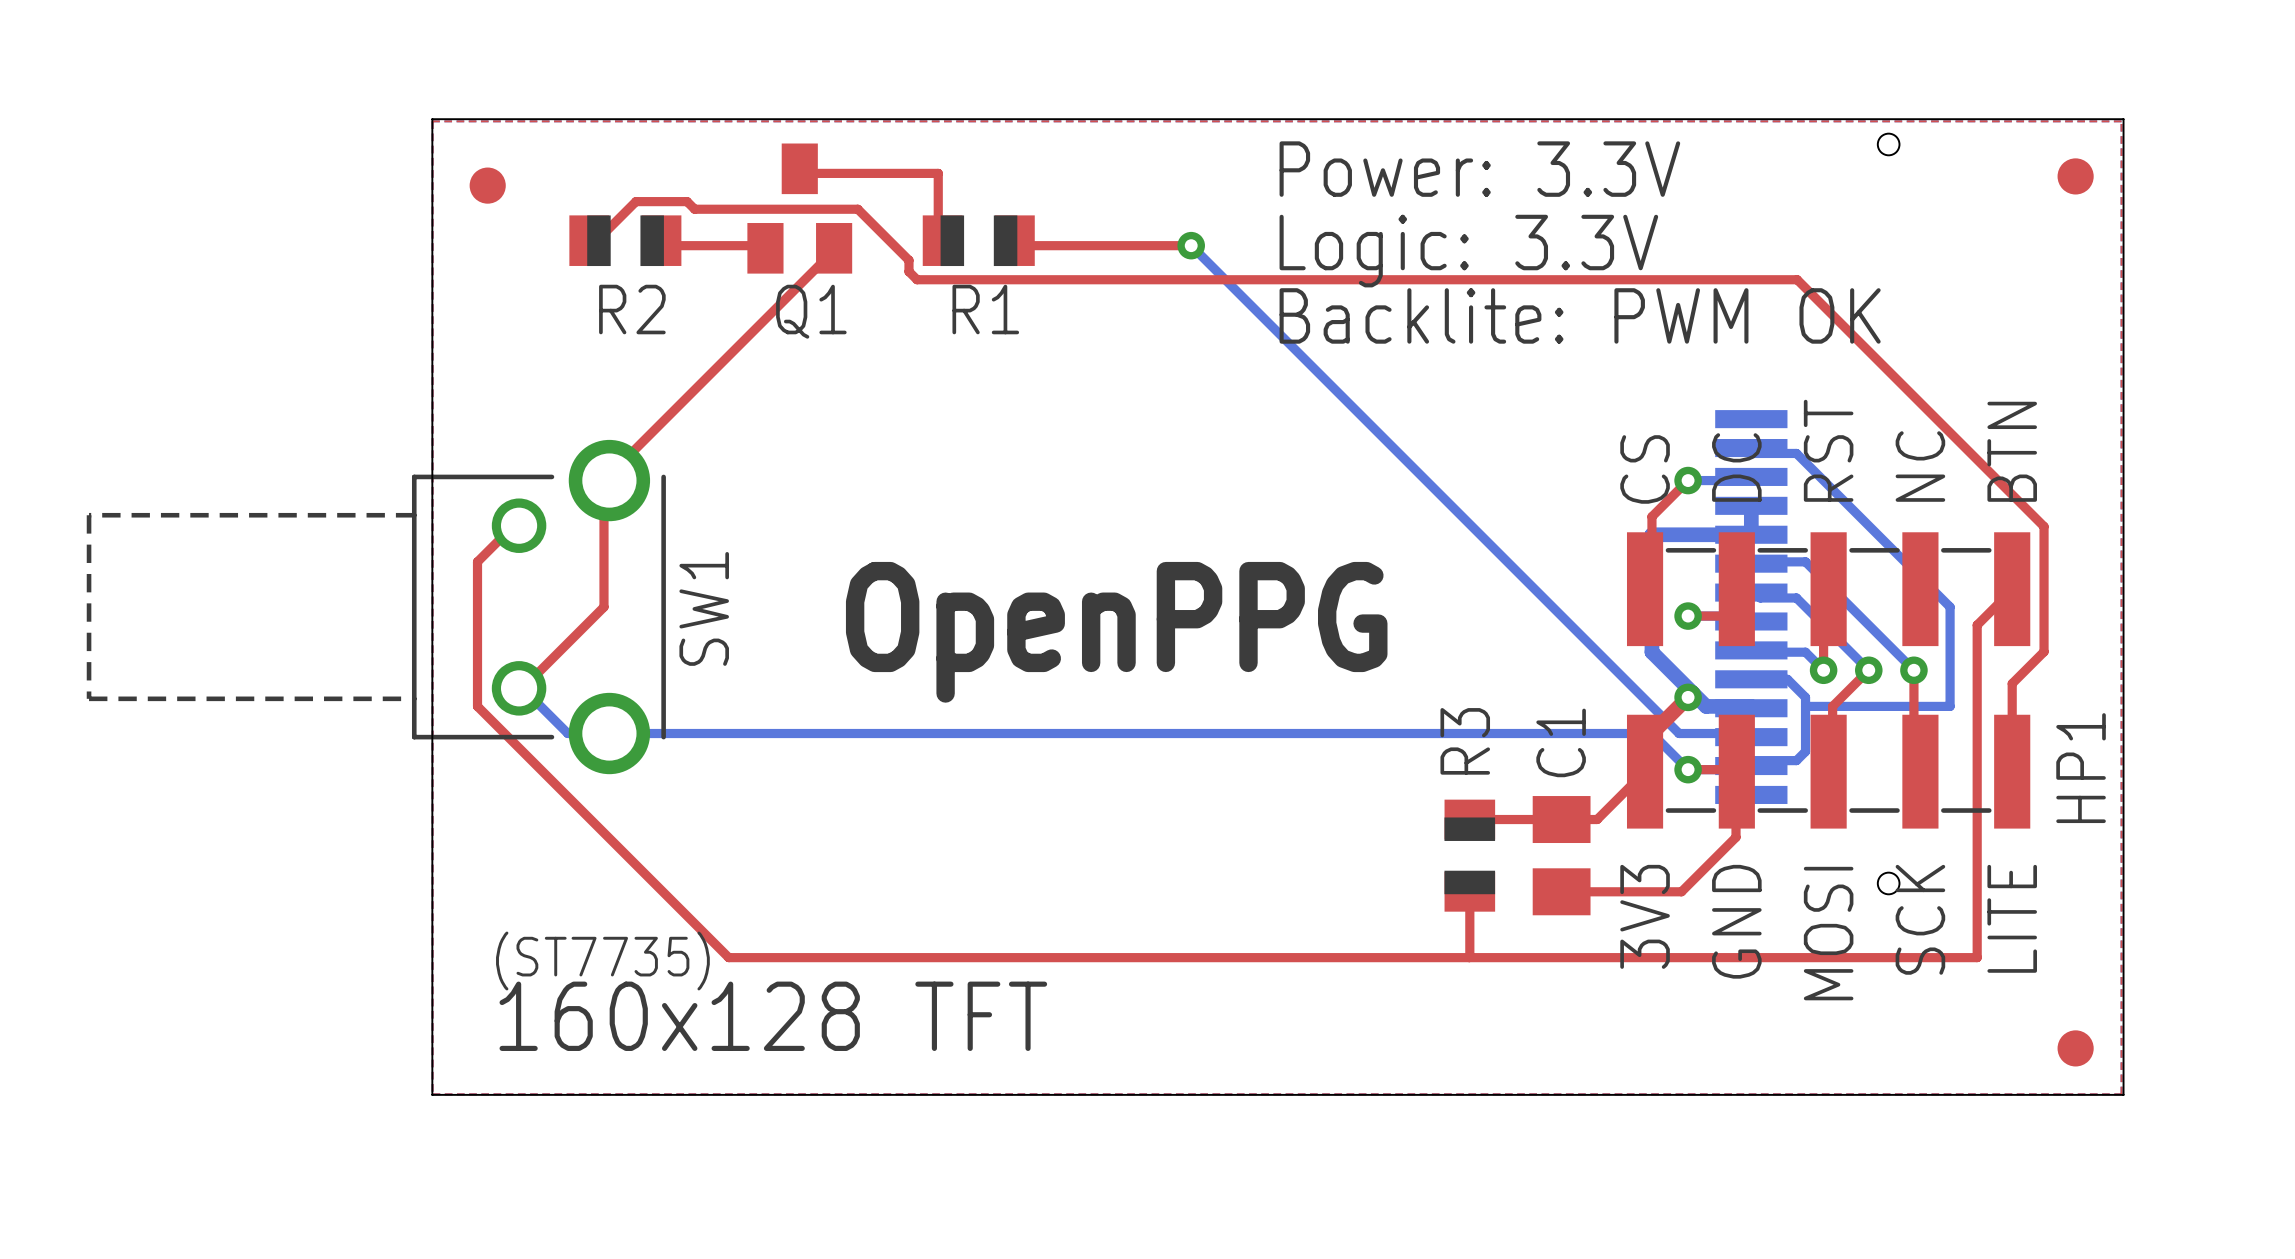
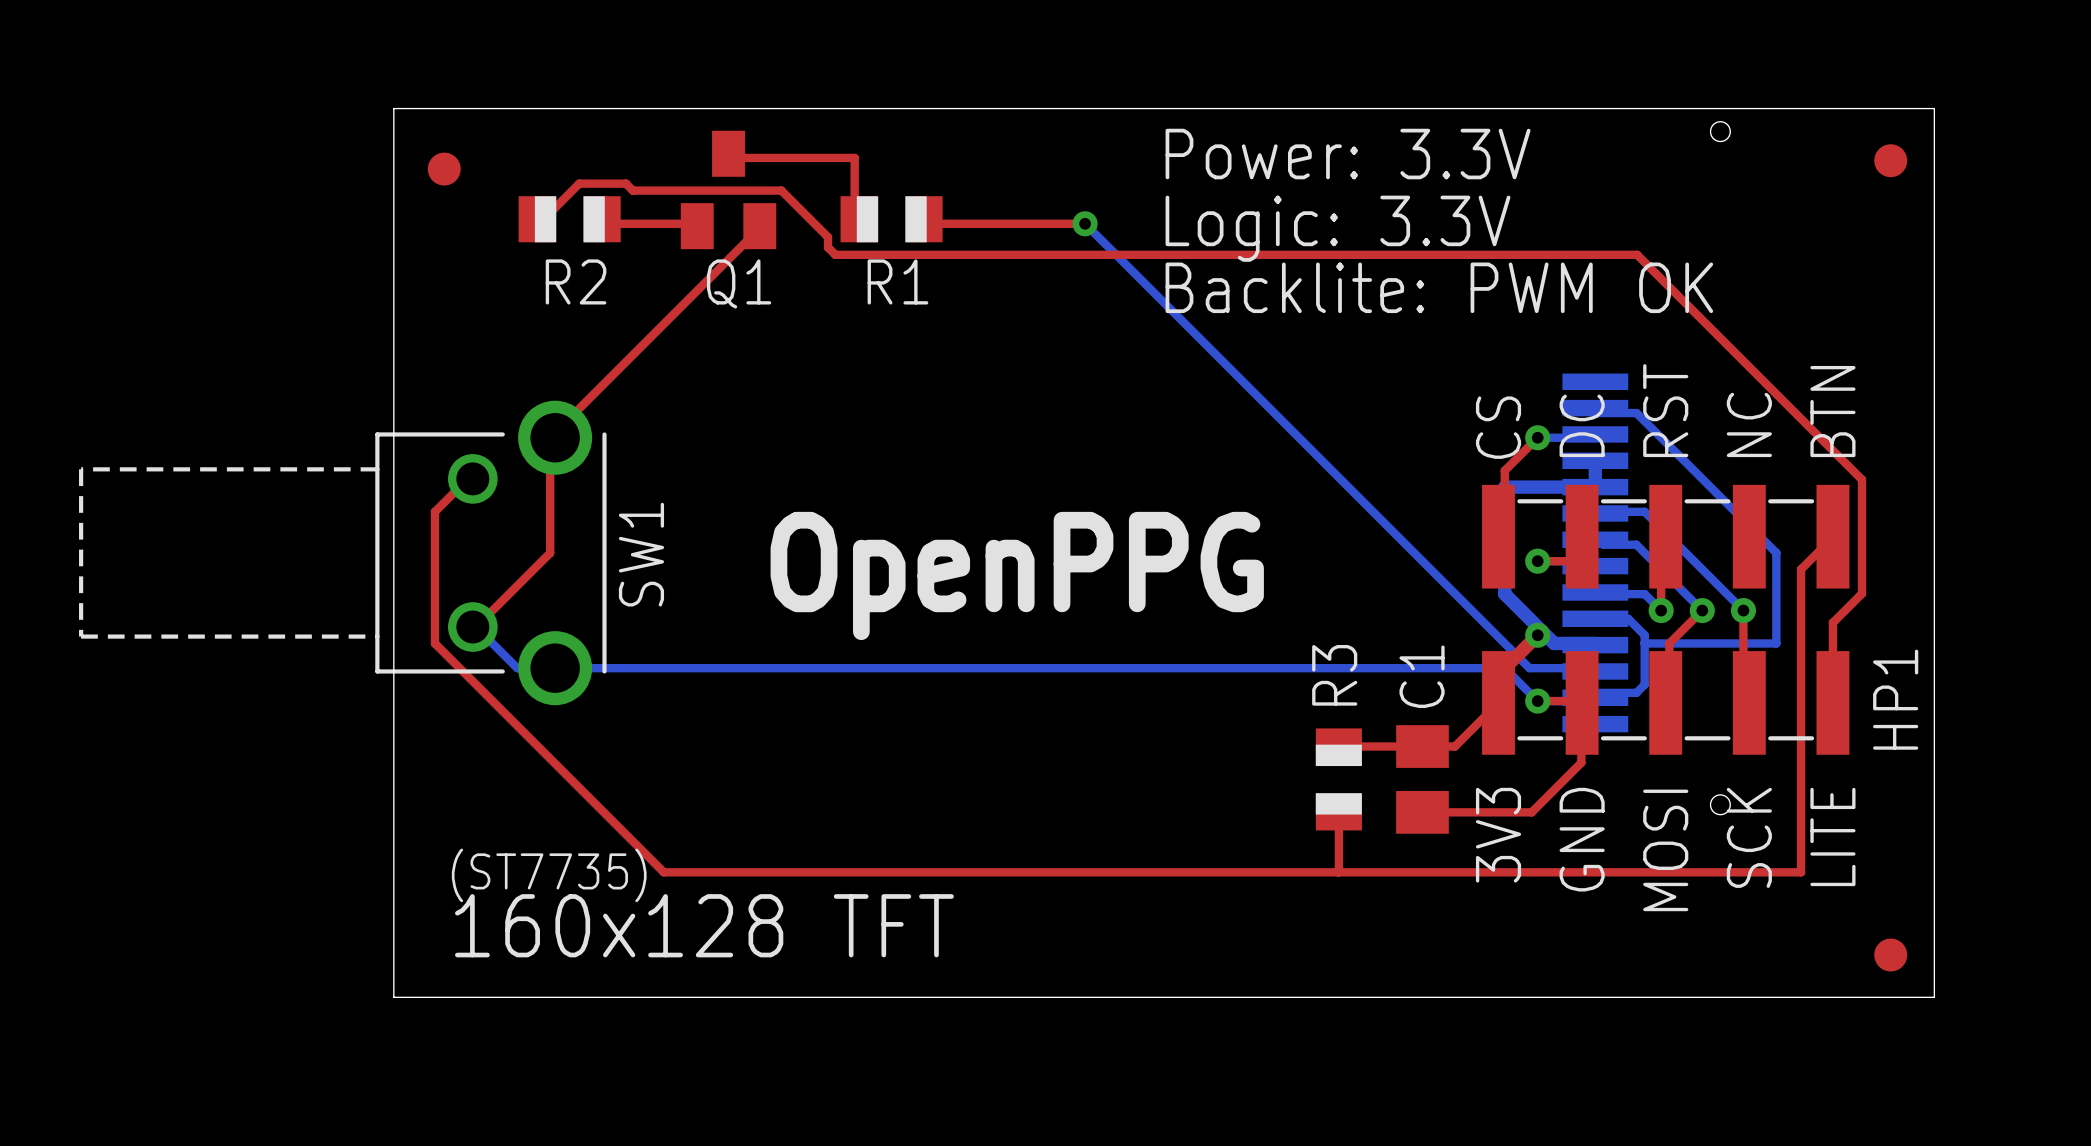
top zone outline: (432, 121) (2121, 121) (2121, 1094) (432, 1094) (432, 121) -> none

